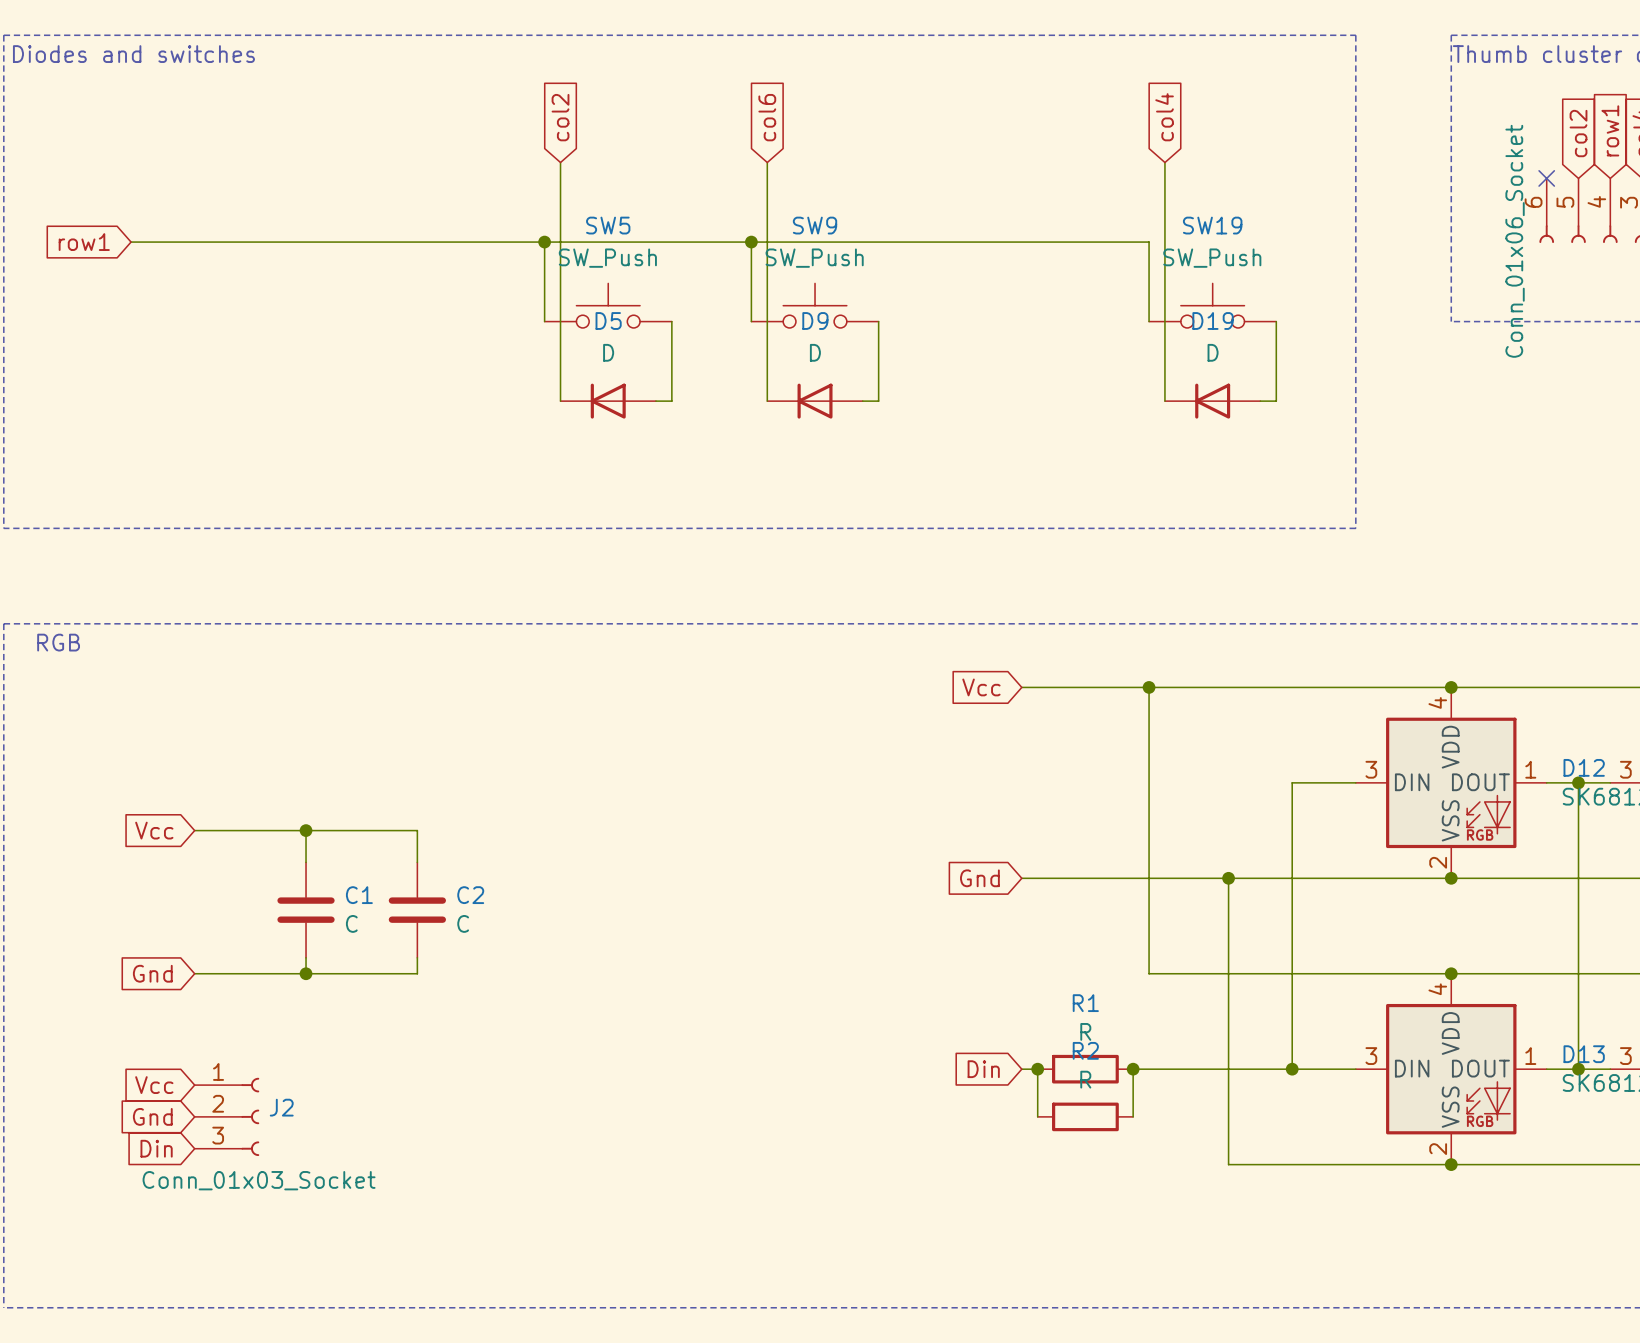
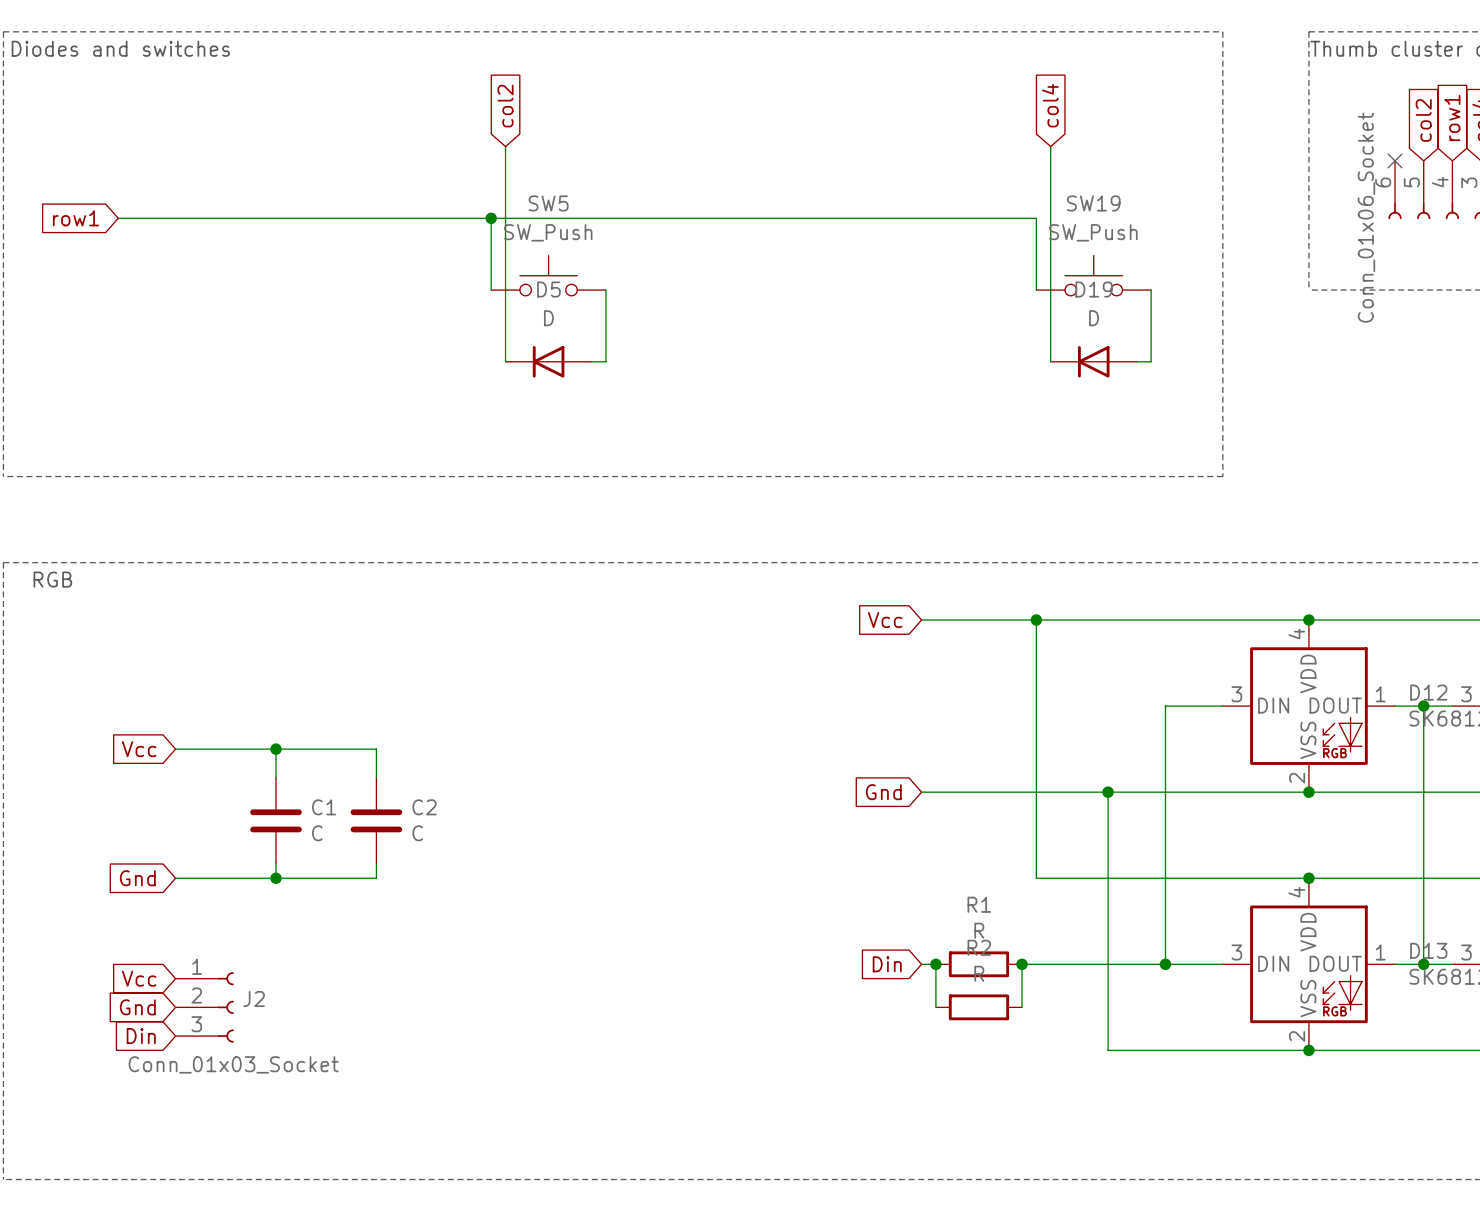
global label: col6 (767, 117) -> none
wire: (767, 162) (767, 401) -> none
wire: (751, 242) (751, 321) -> none
junction: (751, 242) -> none
SW9: SW_Push (815, 305) -> none
wire: (878, 321) (878, 401) (862, 401) -> none
D9: D (815, 401) -> none

